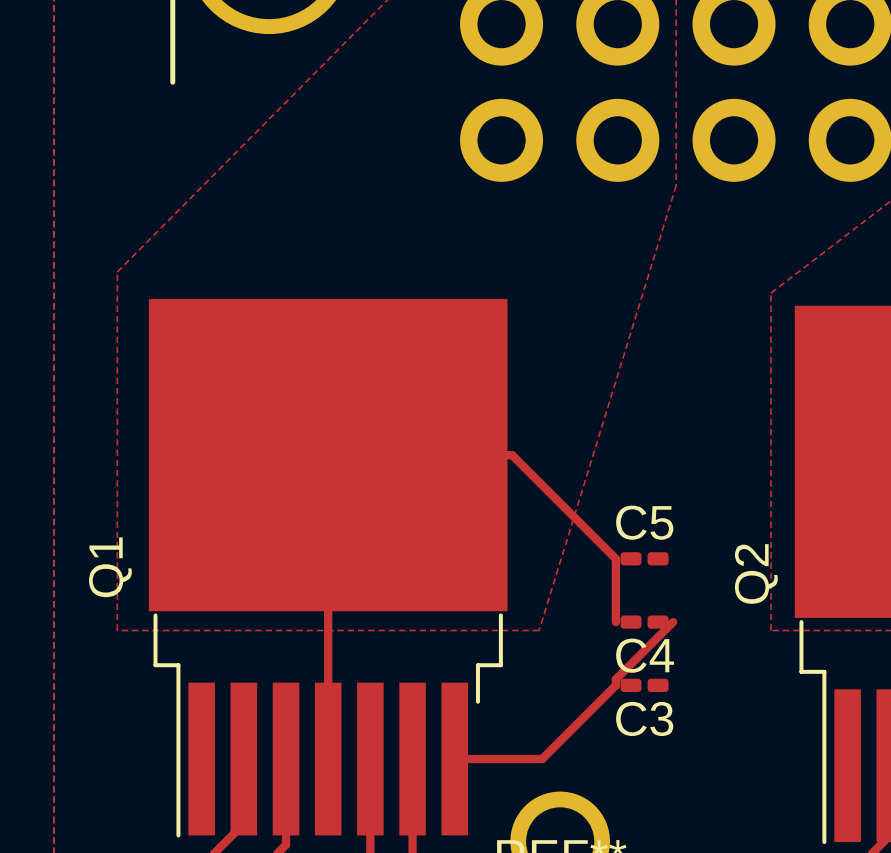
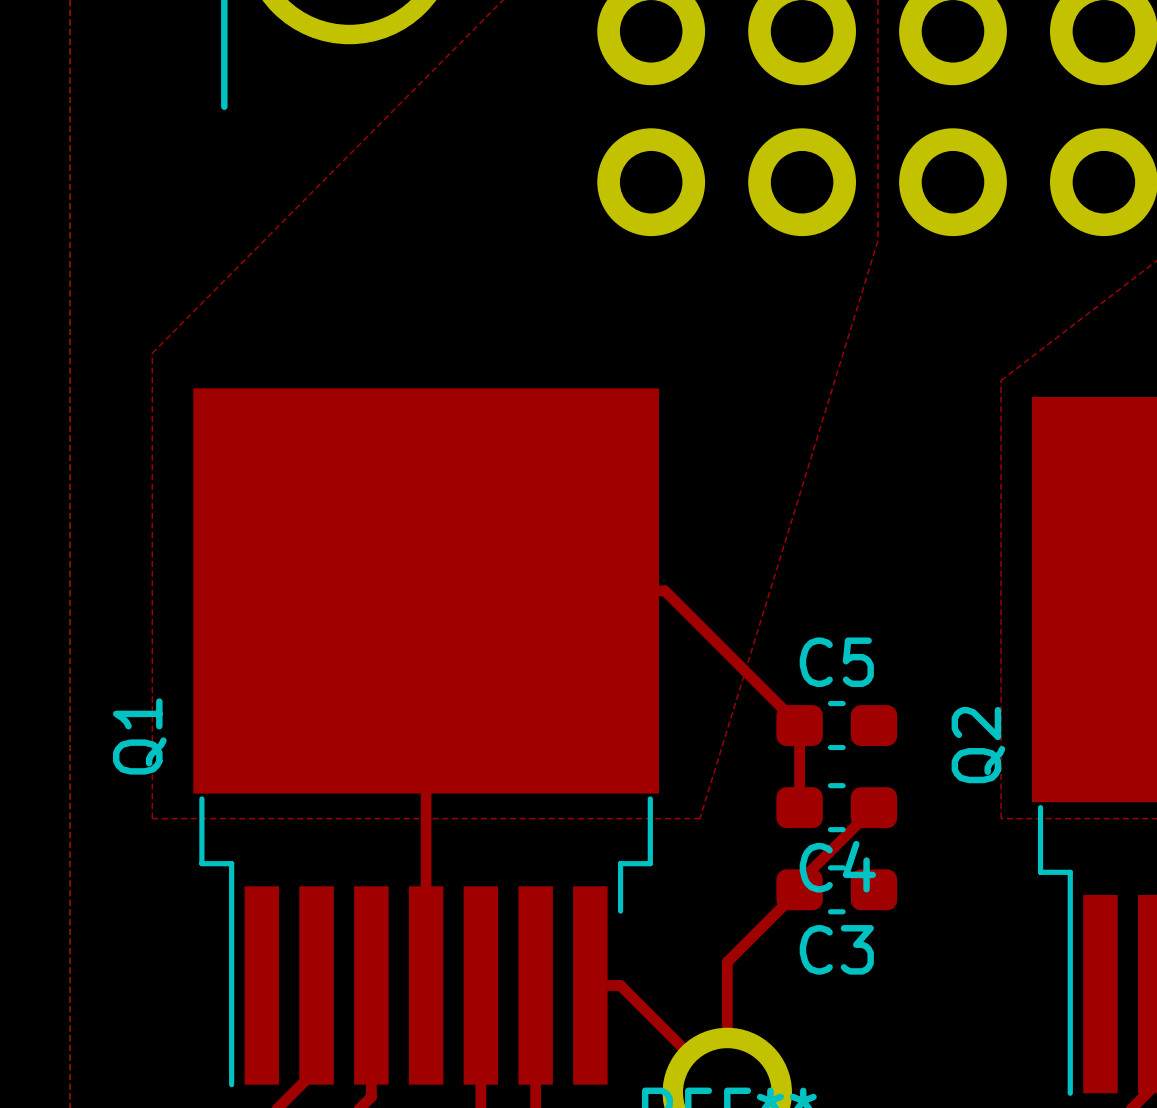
C5 footprint: [620, 552, 669, 566] -> [776, 700, 898, 751]
C4 footprint: [620, 615, 669, 629] -> [776, 783, 898, 833]
C3 footprint: [620, 678, 669, 692] -> [776, 865, 898, 915]
top track: (560, 741) (542, 759) (477, 759) -> (727, 962) (727, 1092) (620, 985)

